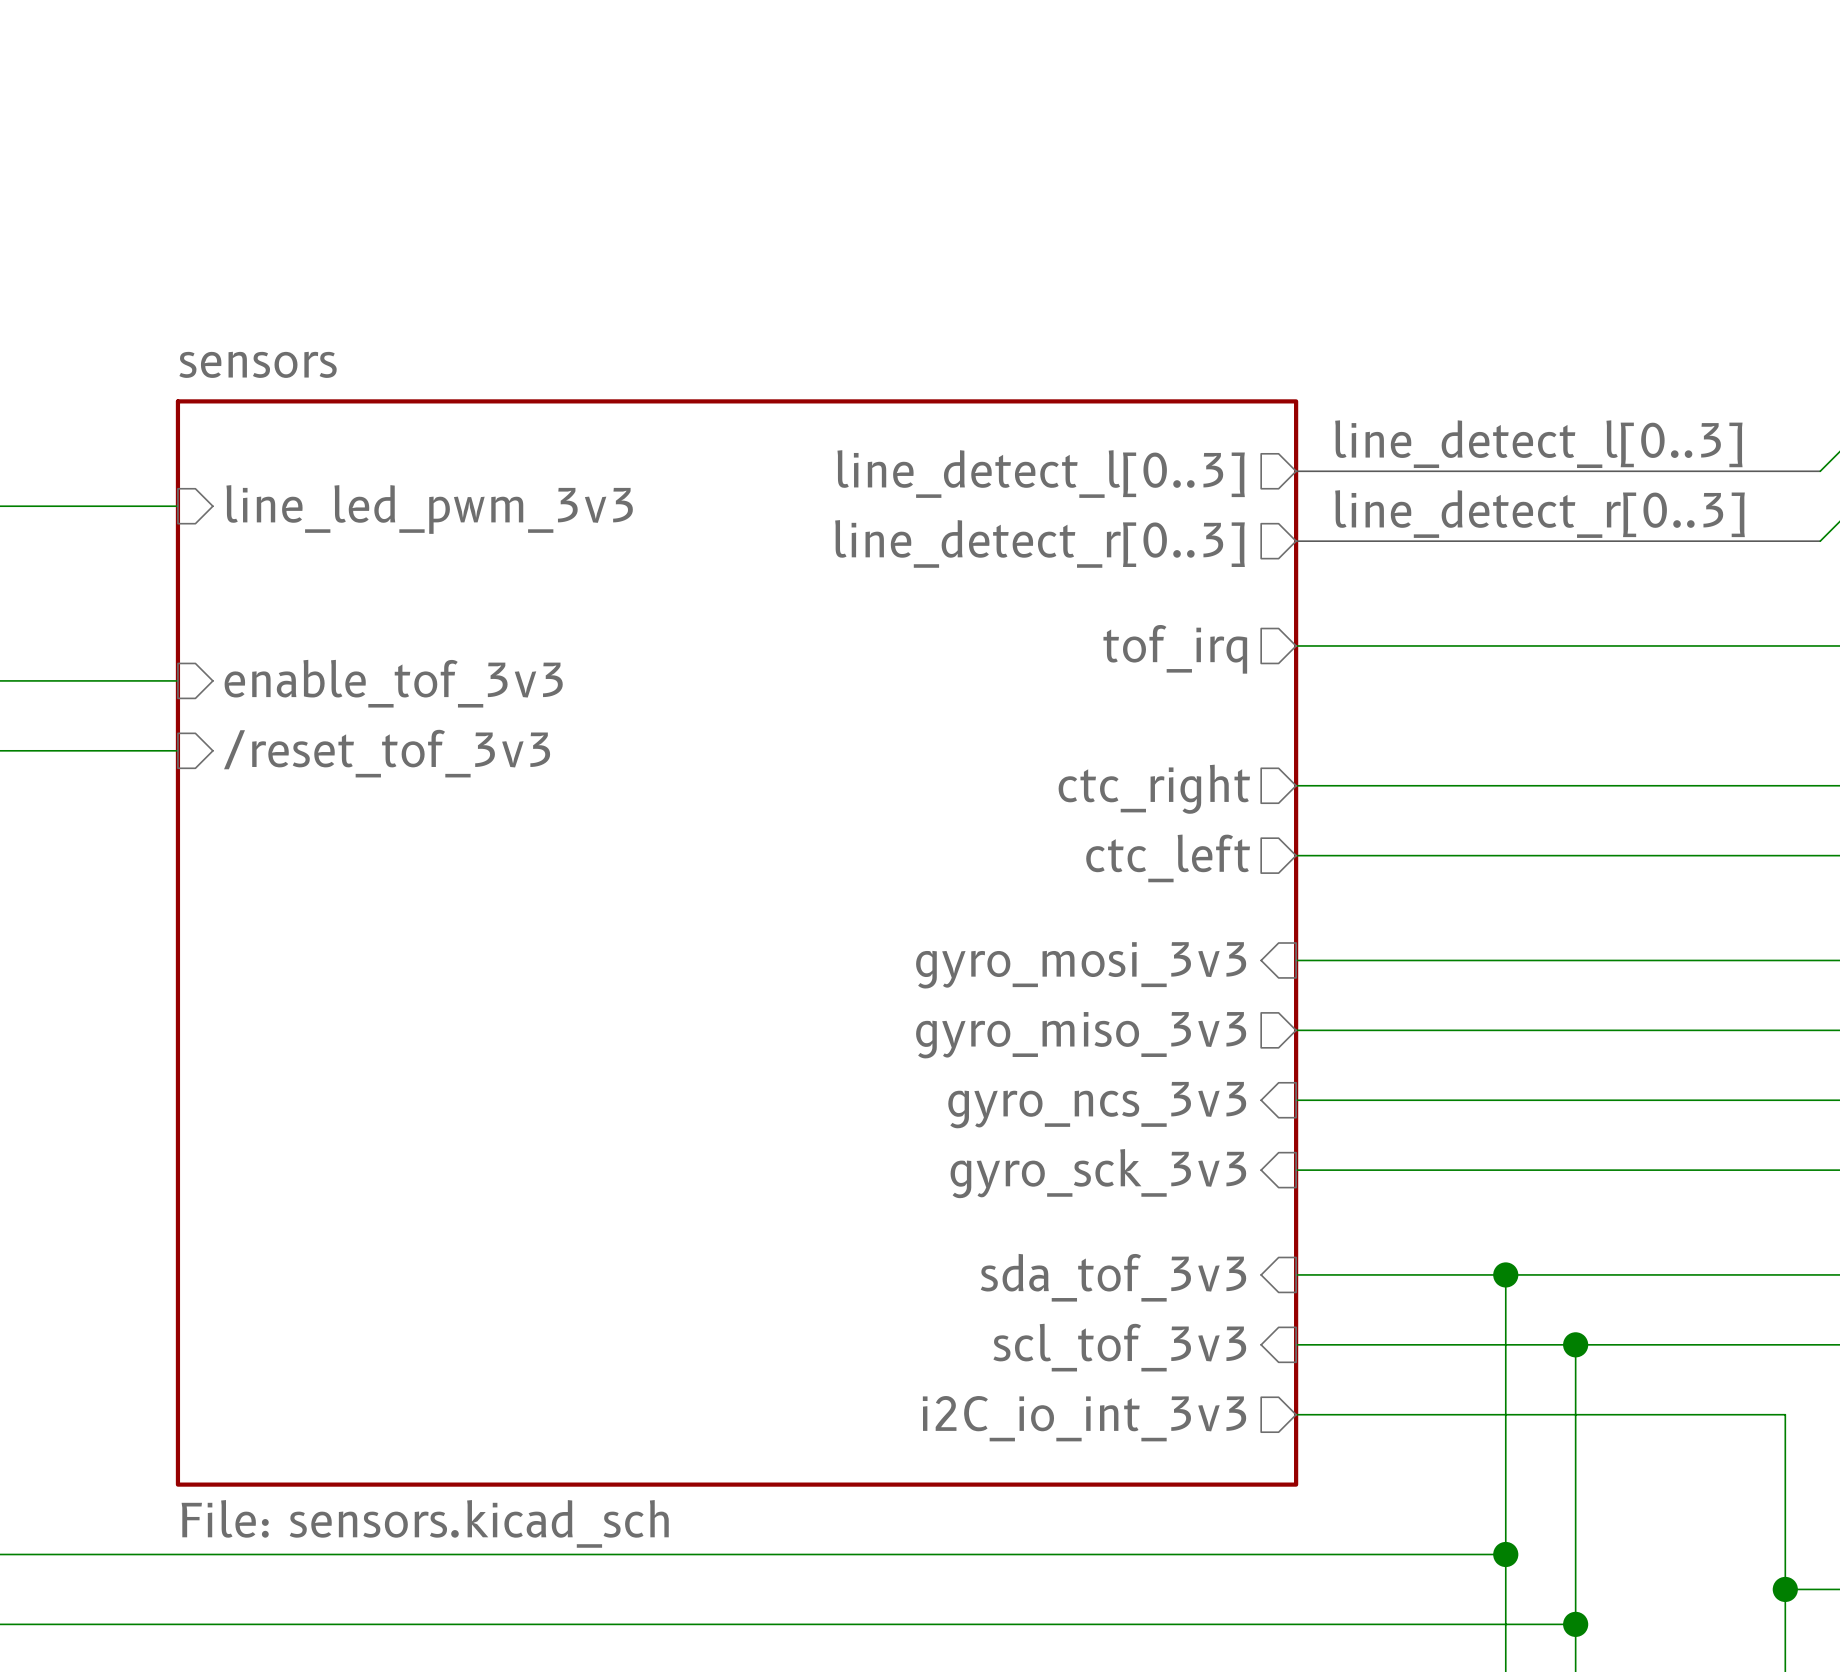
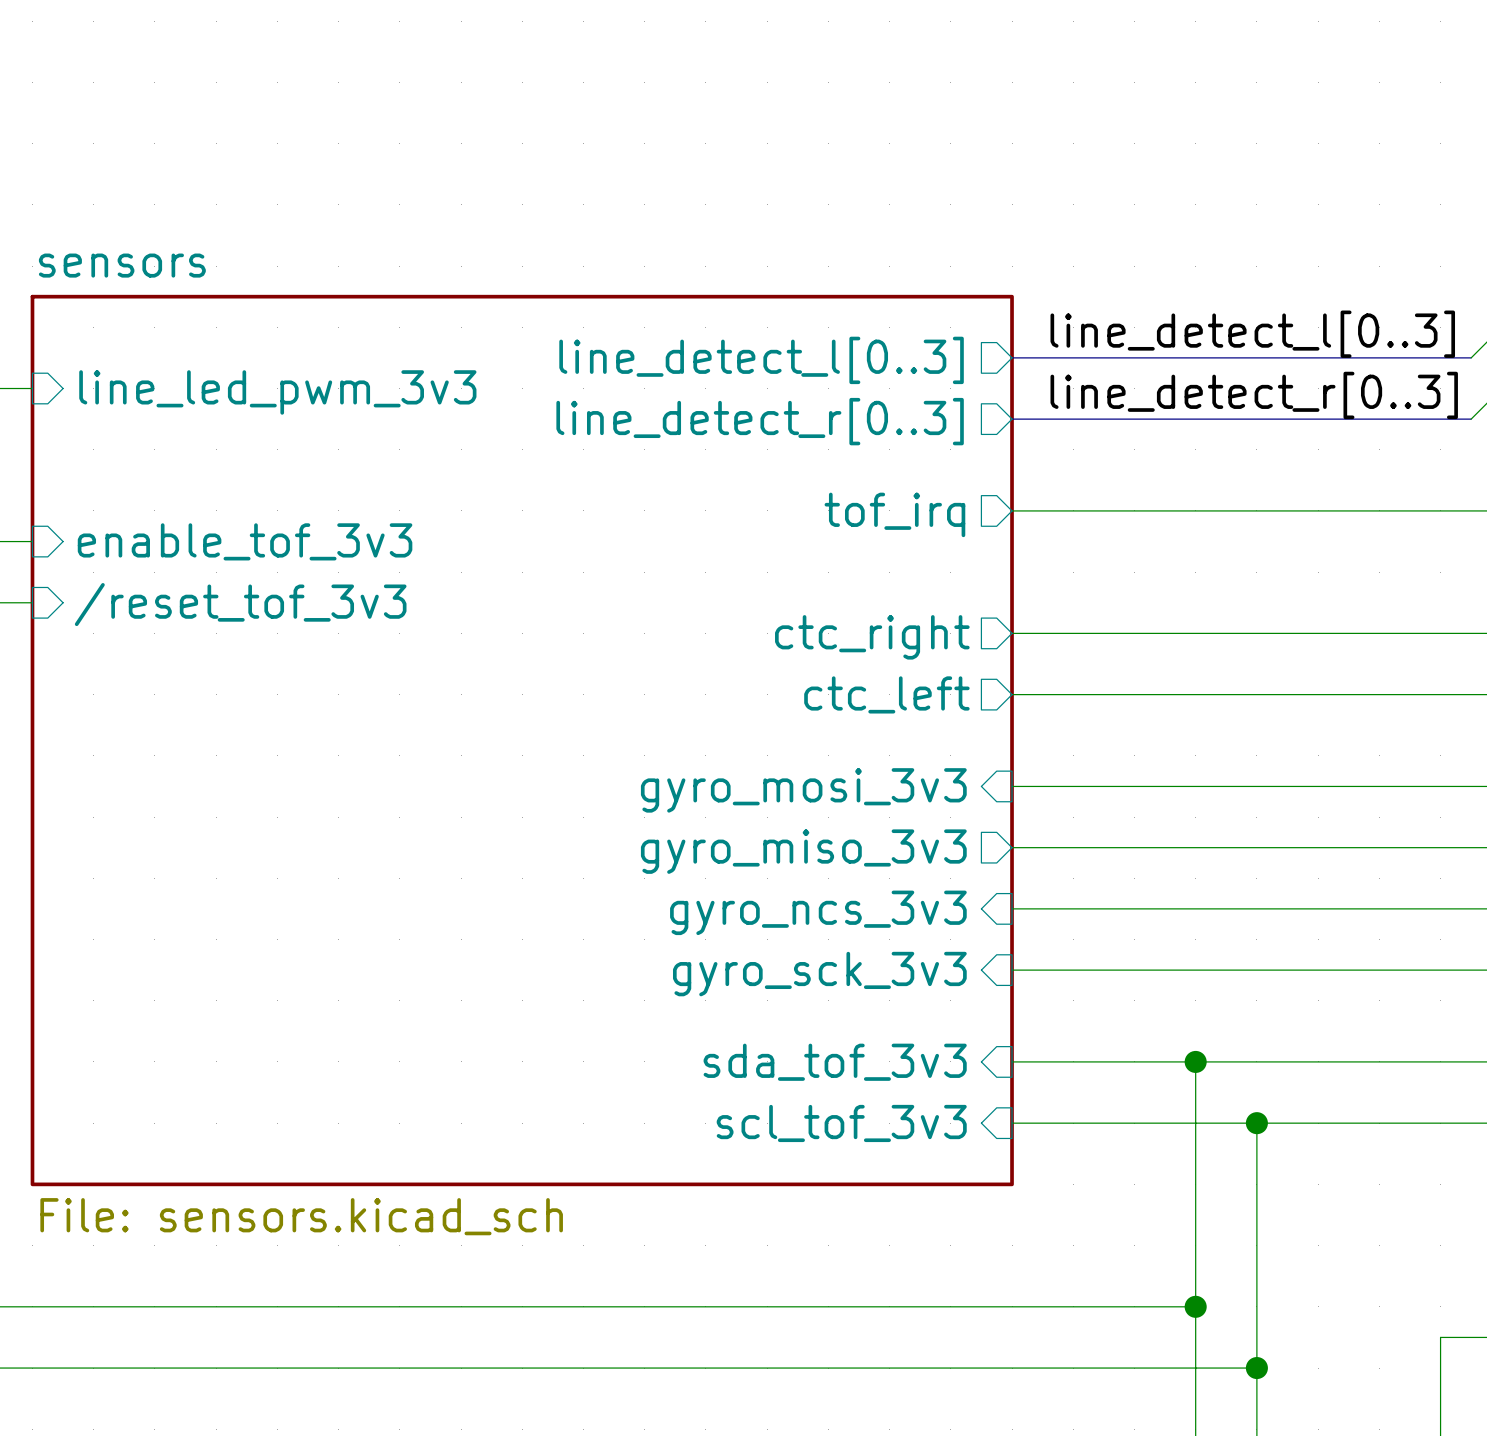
sheet sensors: none -> File: sensors.kicad_sch (522, 740)
sheet sensors: File: sensors.kicad_sch (737, 943) -> none
wire: (1296, 1414) (1785, 1414) (1785, 1589) -> none
sheet pin: i2C_io_int_3v3 (1084, 1418) -> none
junction: (1785, 1589) -> none

